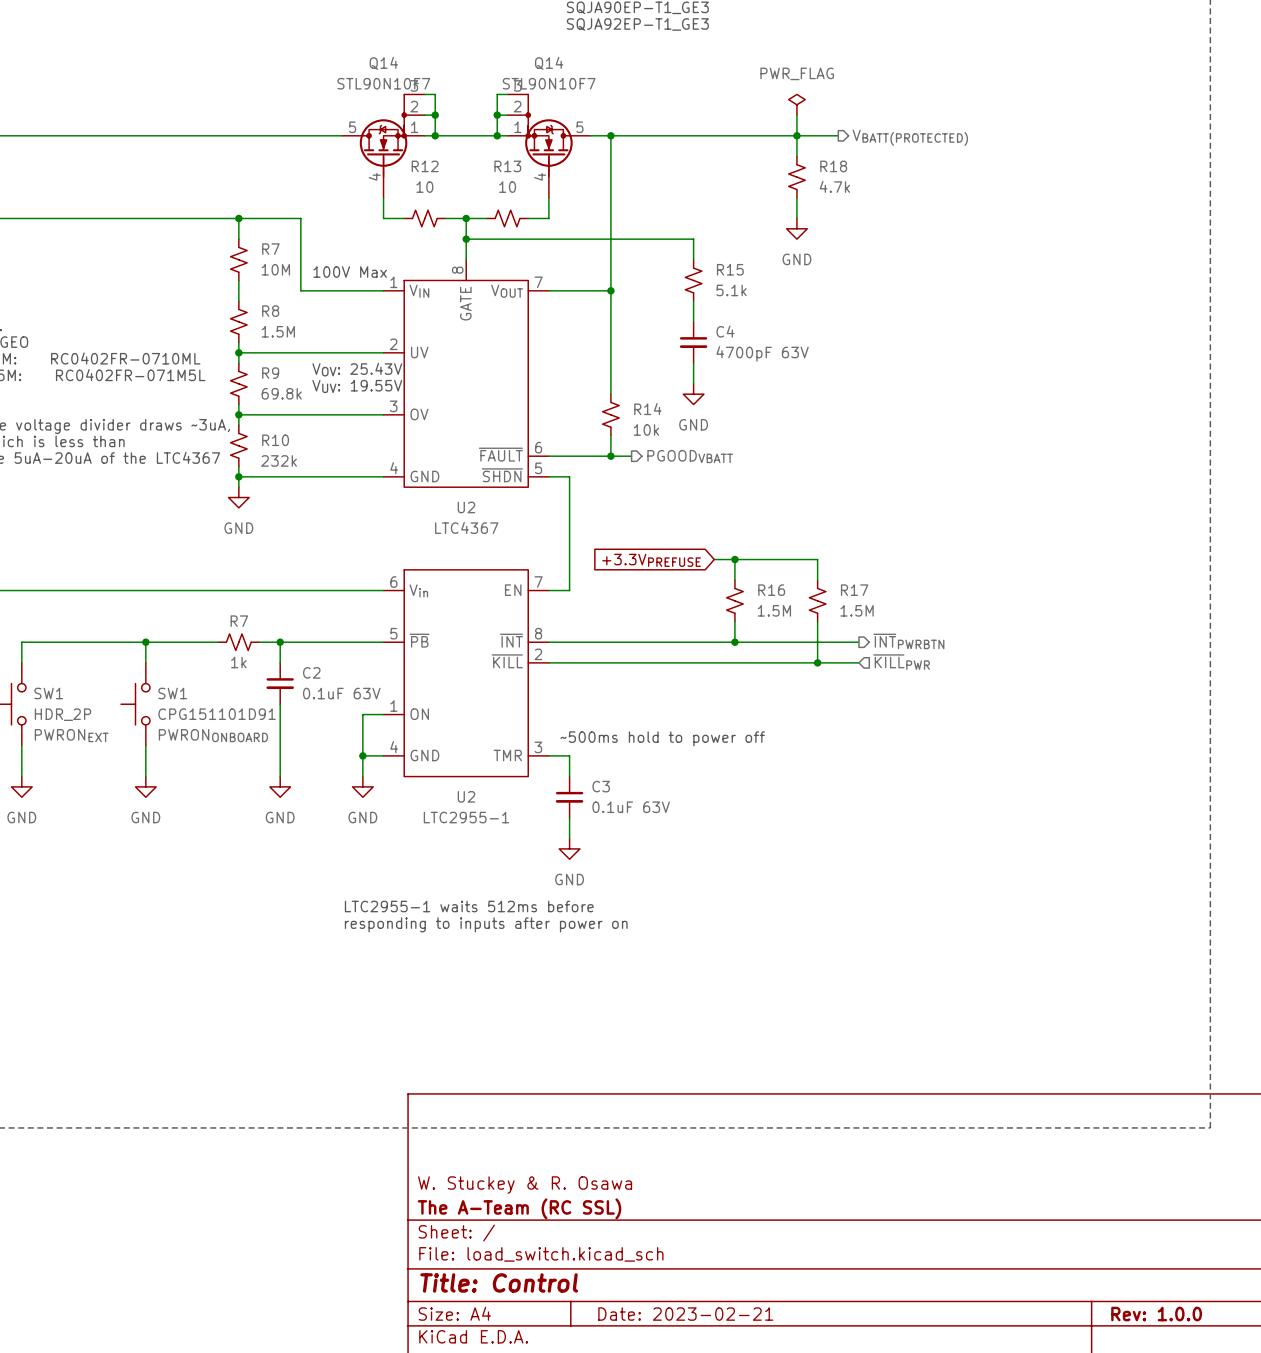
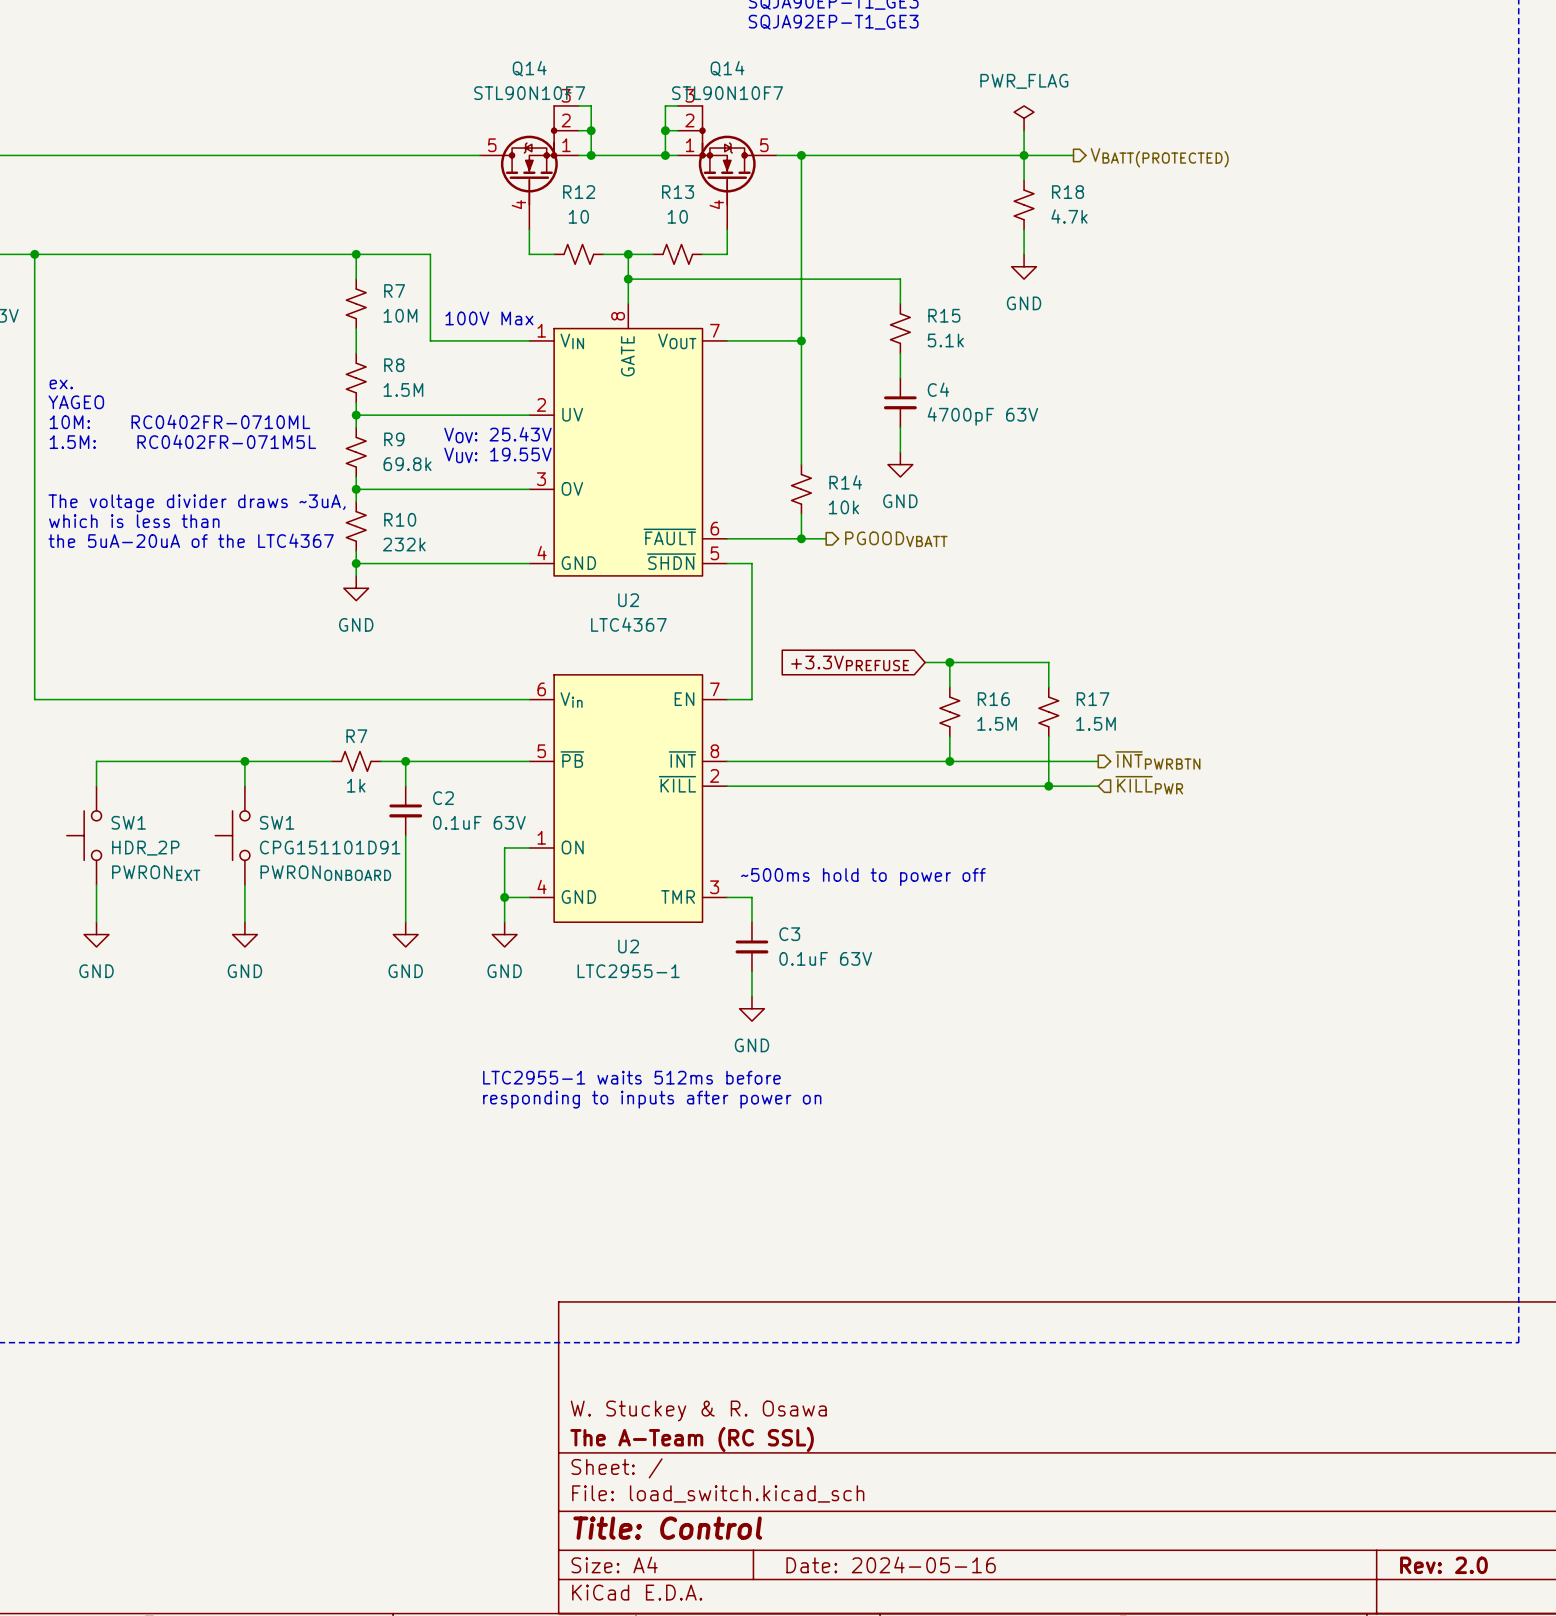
title block: Date: 2023-02-21 (685, 1314) -> Date: 2024-05-16 (891, 1564)
title block: Rev: 1.0.0 (1156, 1314) -> Rev: 2.0 (1443, 1565)

